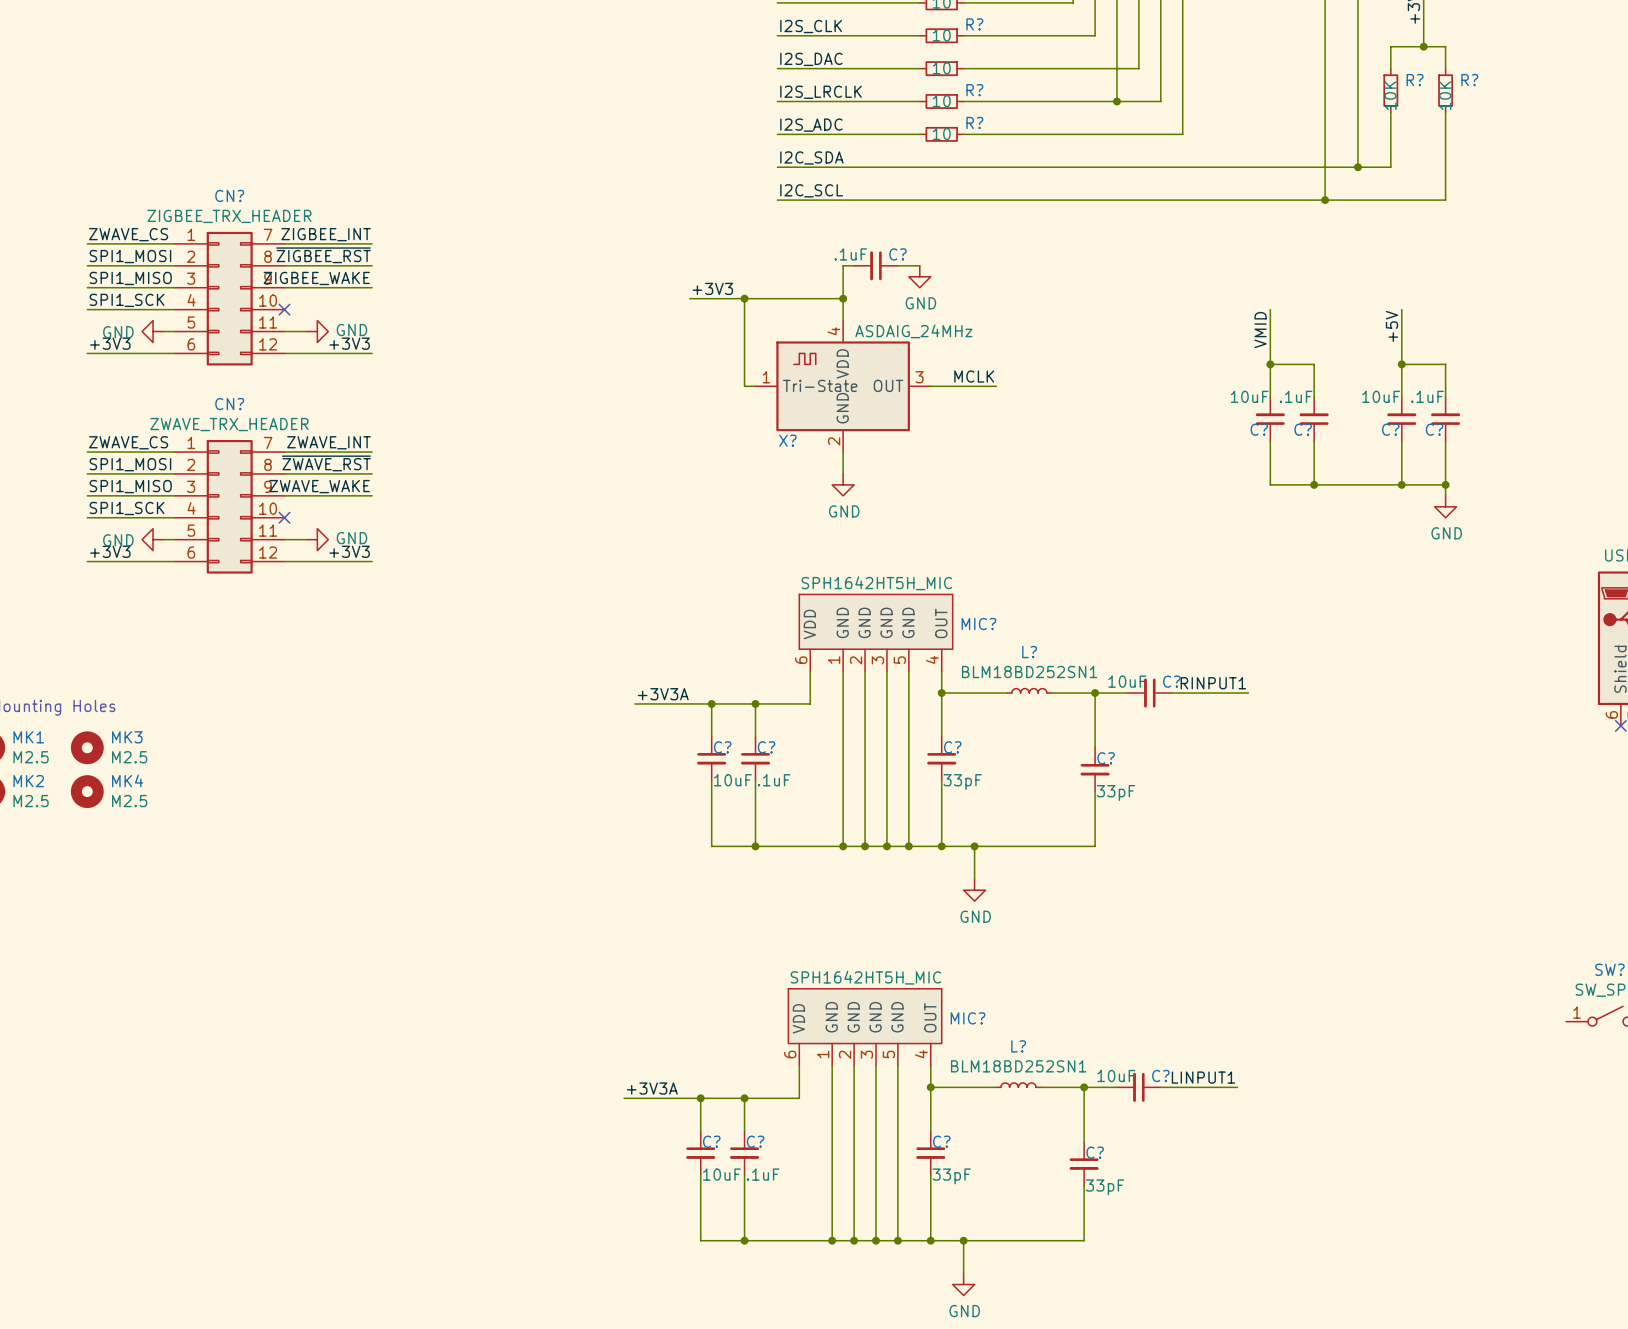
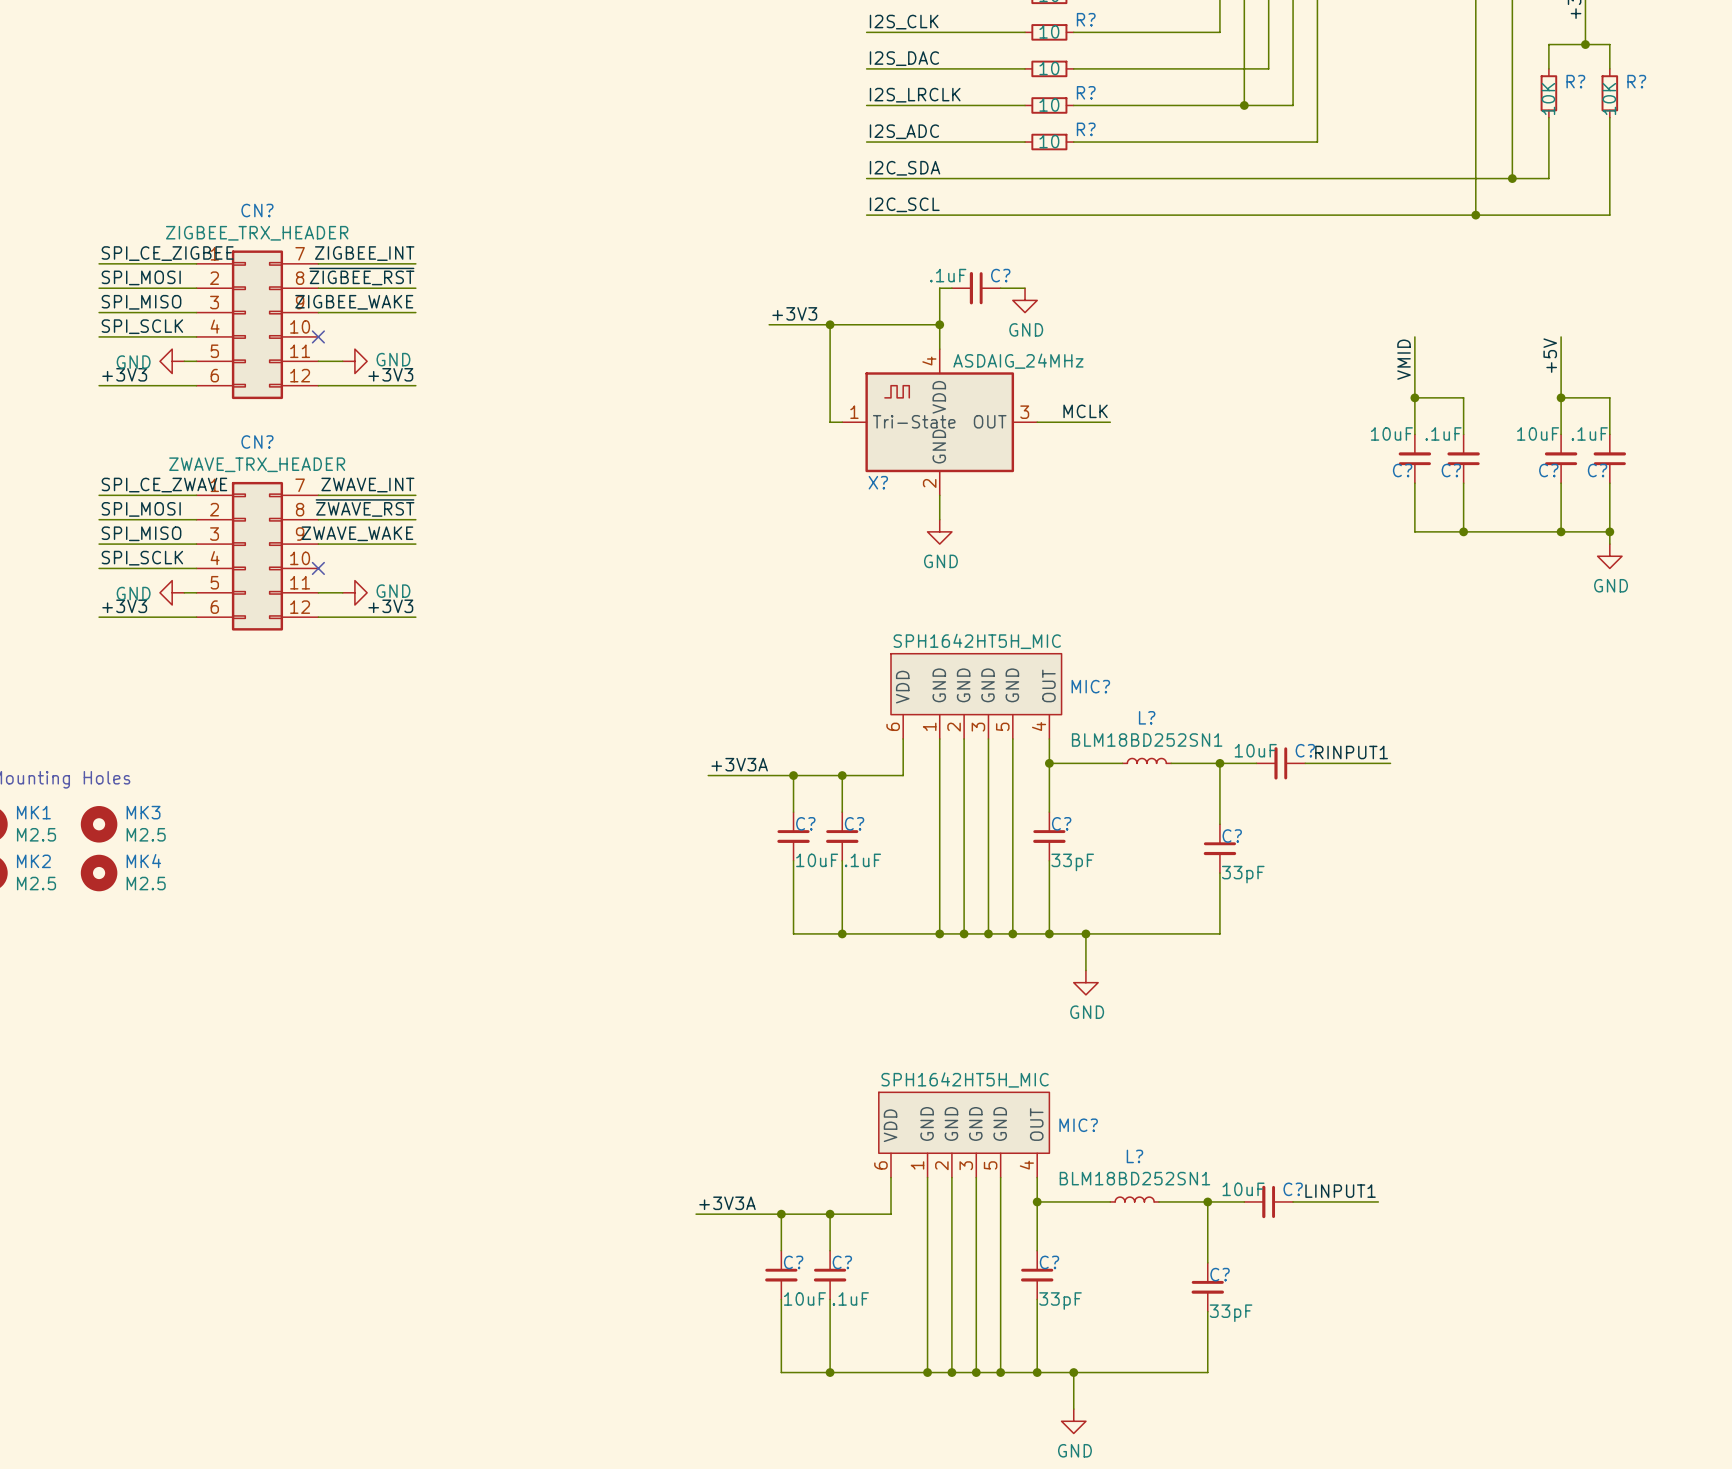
label: ZWAVE_CS (128, 234) -> SPI_CE_ZIGBEE (167, 253)
label: SPI1_MOSI (130, 256) -> SPI_MOSI (141, 277)
label: SPI1_MISO (130, 278) -> SPI_MISO (141, 302)
label: SPI1_SCK (127, 300) -> SPI_SCLK (142, 326)
label: ZWAVE_CS (128, 442) -> SPI_CE_ZWAVE (164, 485)
label: SPI1_MOSI (130, 464) -> SPI_MOSI (141, 509)
label: SPI1_MISO (130, 486) -> SPI_MISO (141, 533)
label: SPI1_SCK (127, 508) -> SPI_SCLK (142, 558)

